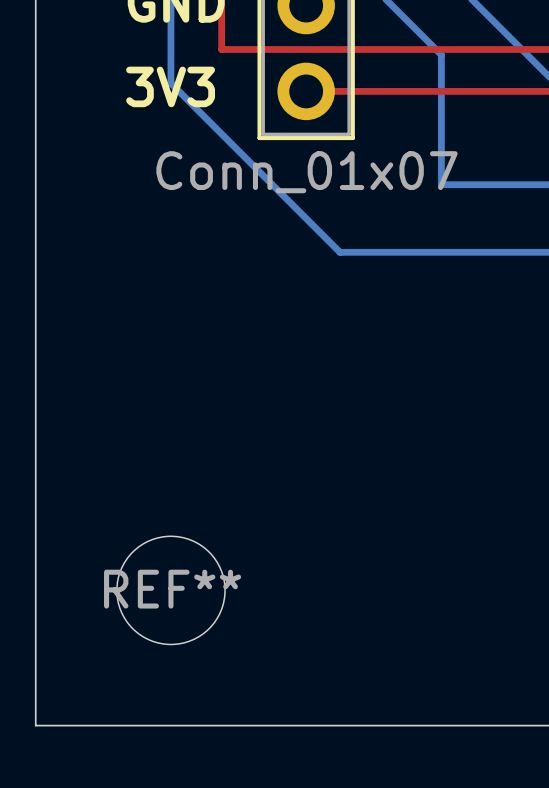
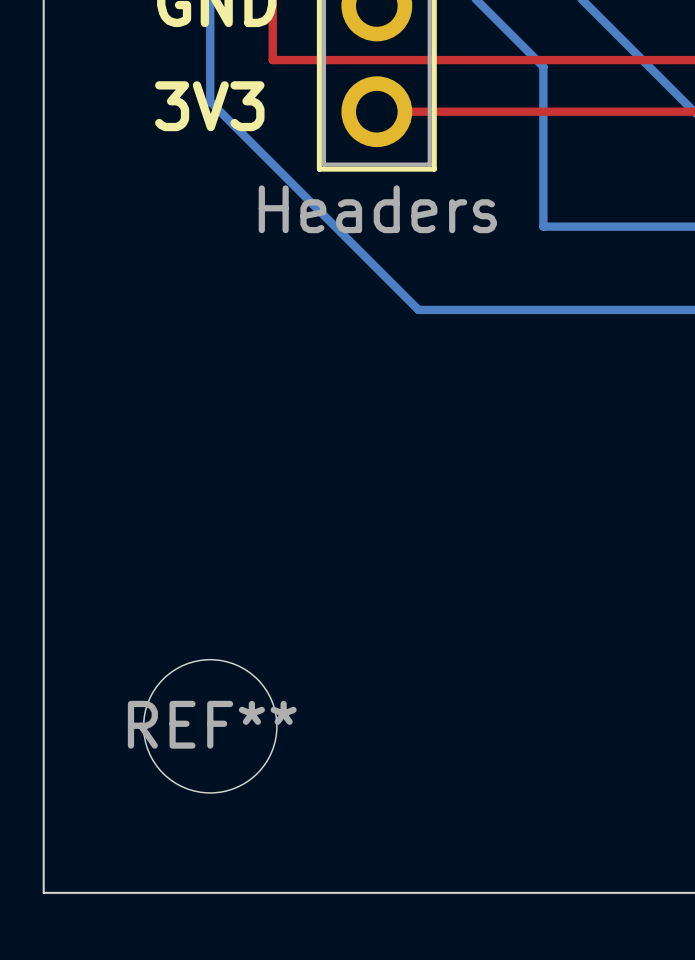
part value: Conn_01x07 (306, 172) -> Headers (377, 209)

